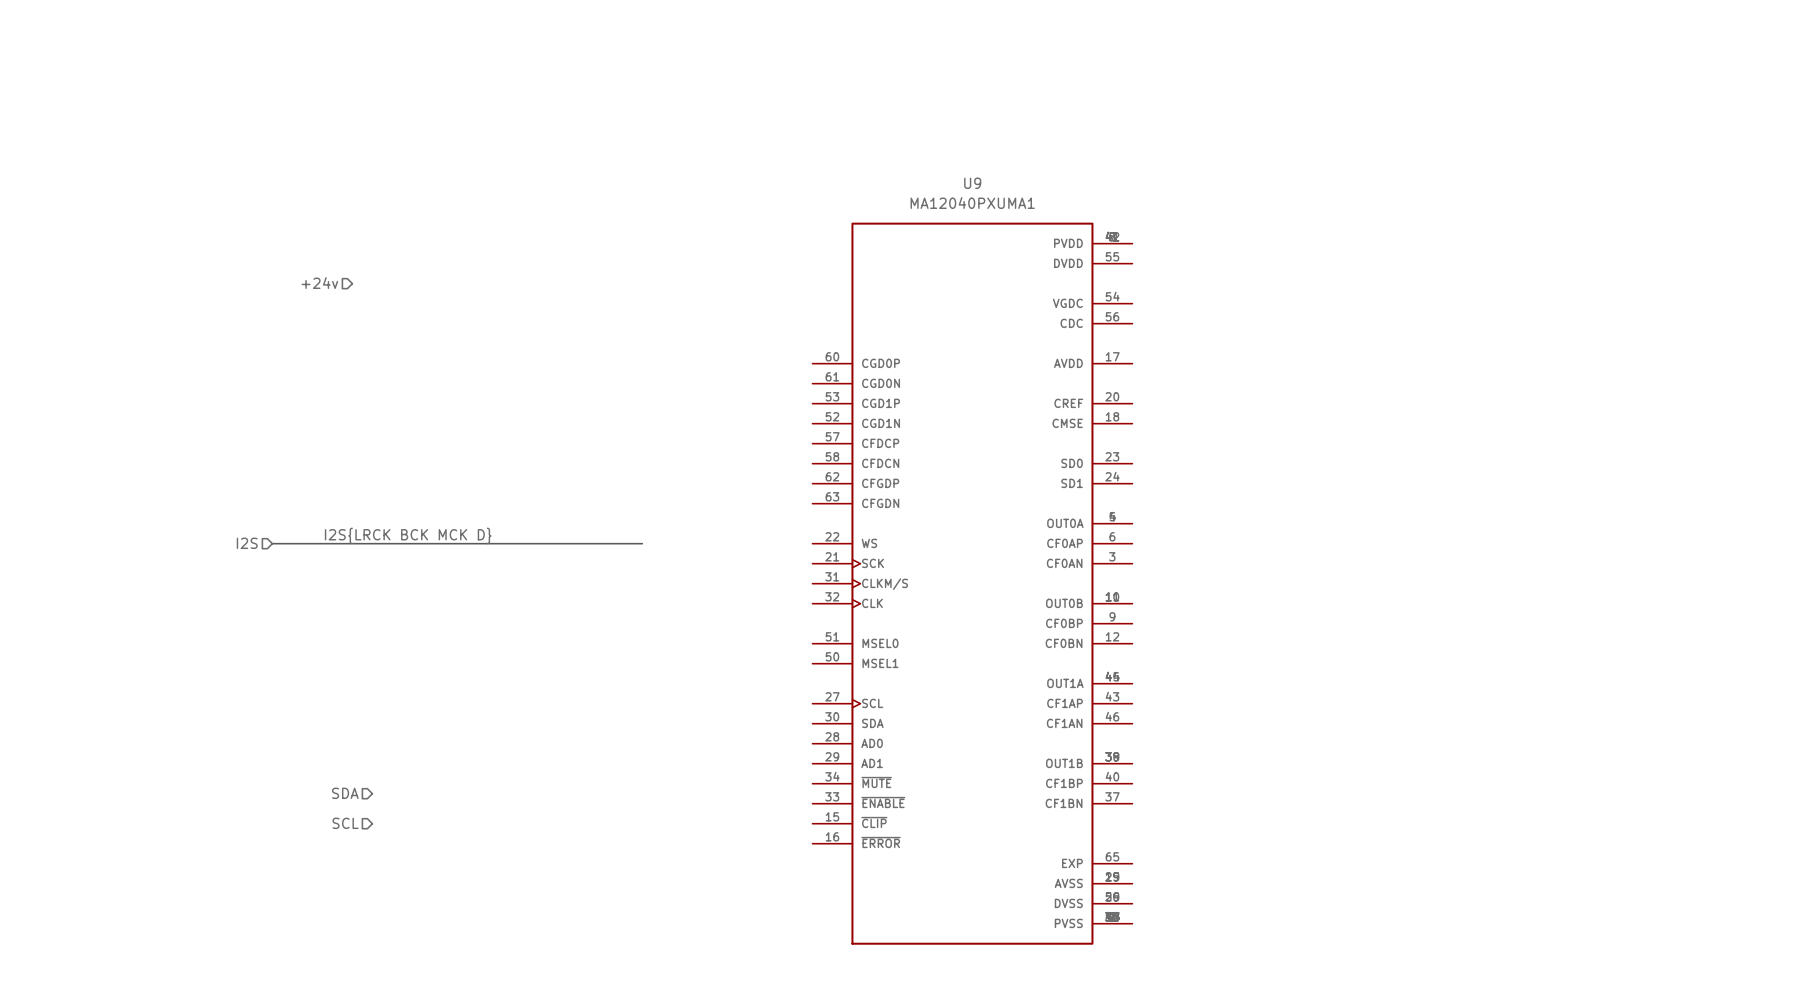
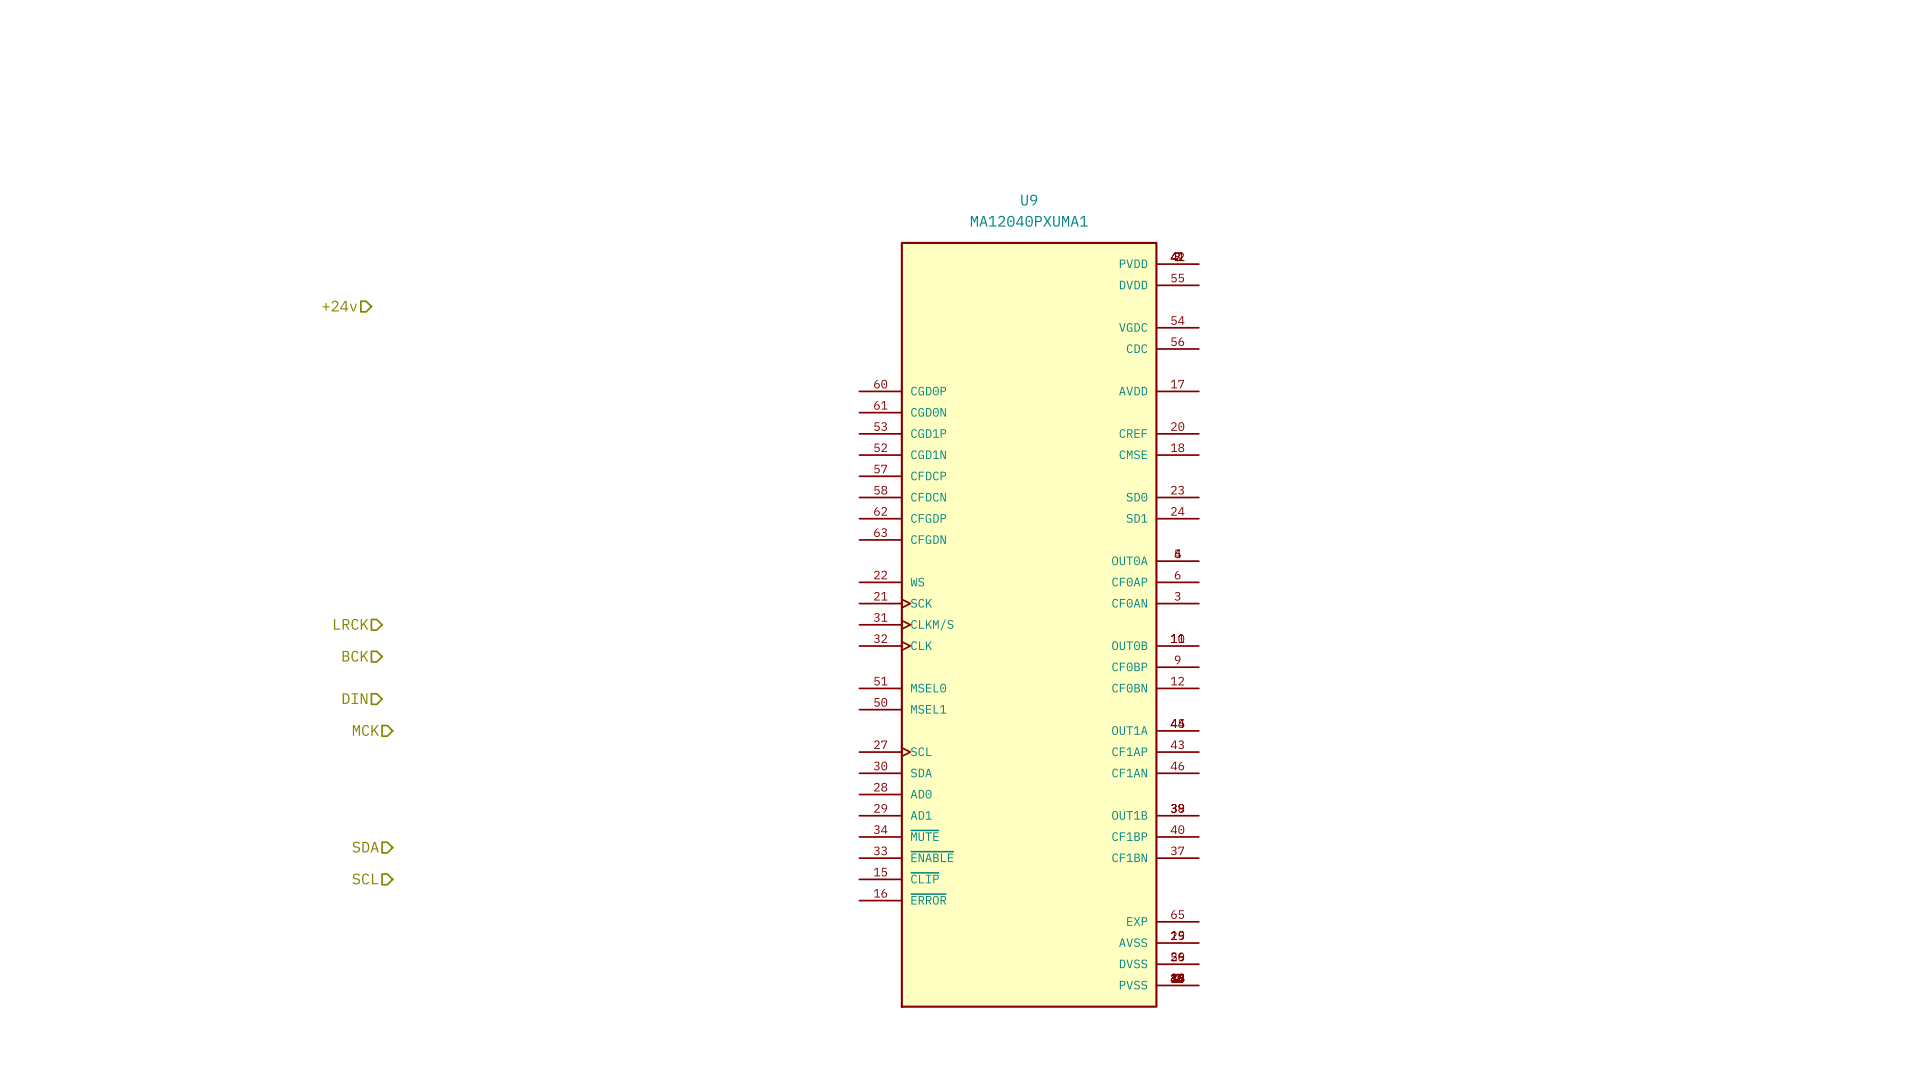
label: I2S{LRCK BCK MCK D} (408, 535) -> none
hierarchical label: I2S (247, 543) -> none
bus: (272, 543) (642, 543) -> none
hierarchical label: none -> LRCK (351, 624)
hierarchical label: none -> BCK (355, 656)
hierarchical label: none -> DIN (355, 698)
hierarchical label: none -> MCK (365, 730)

